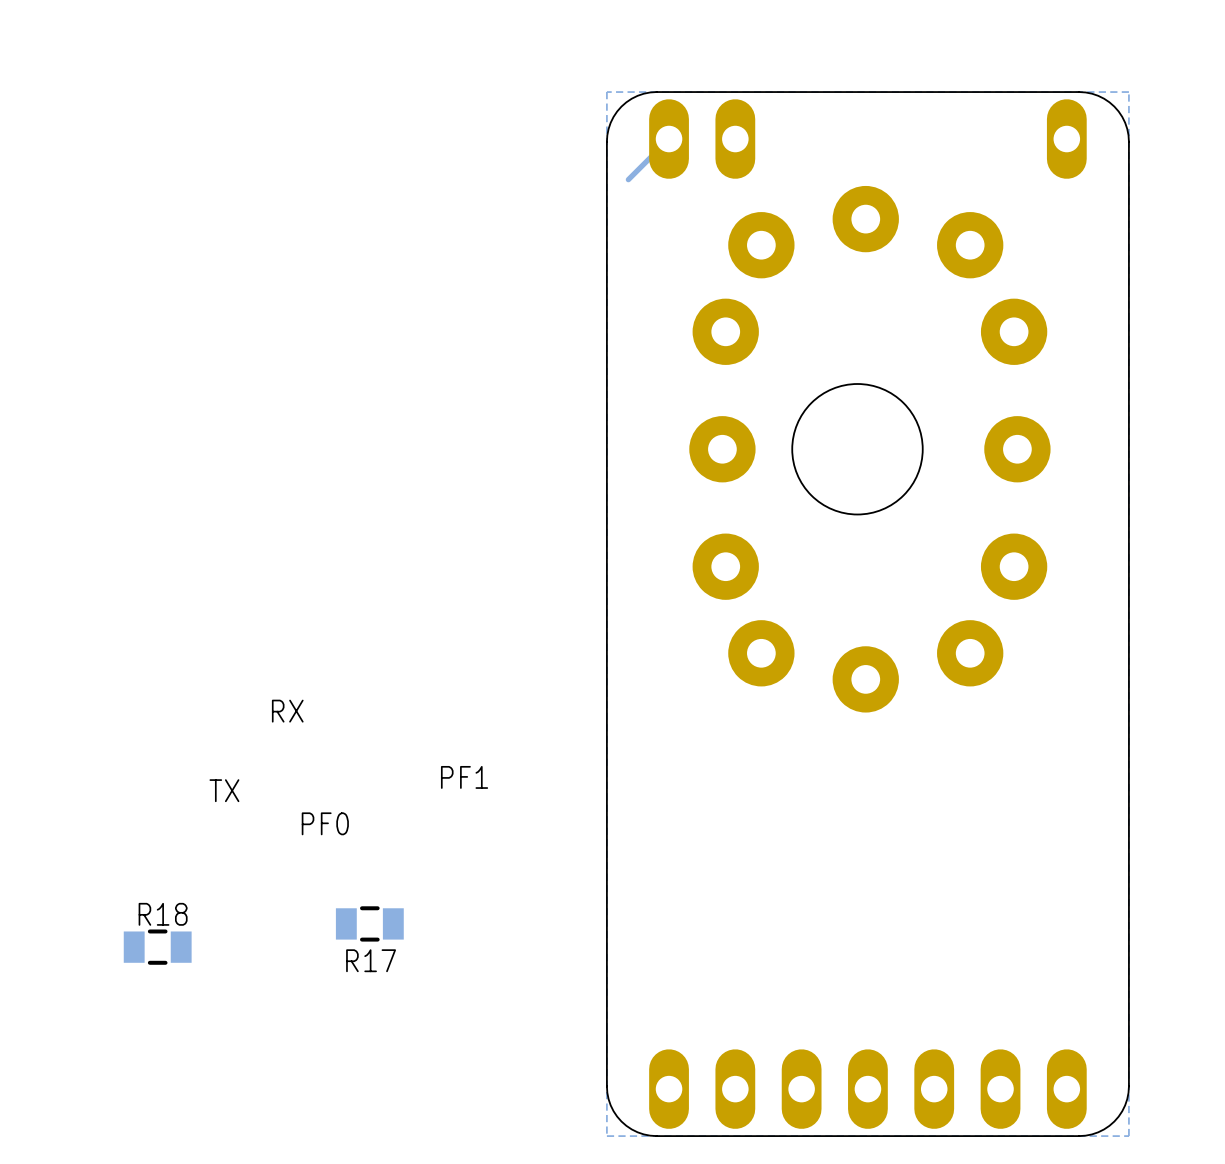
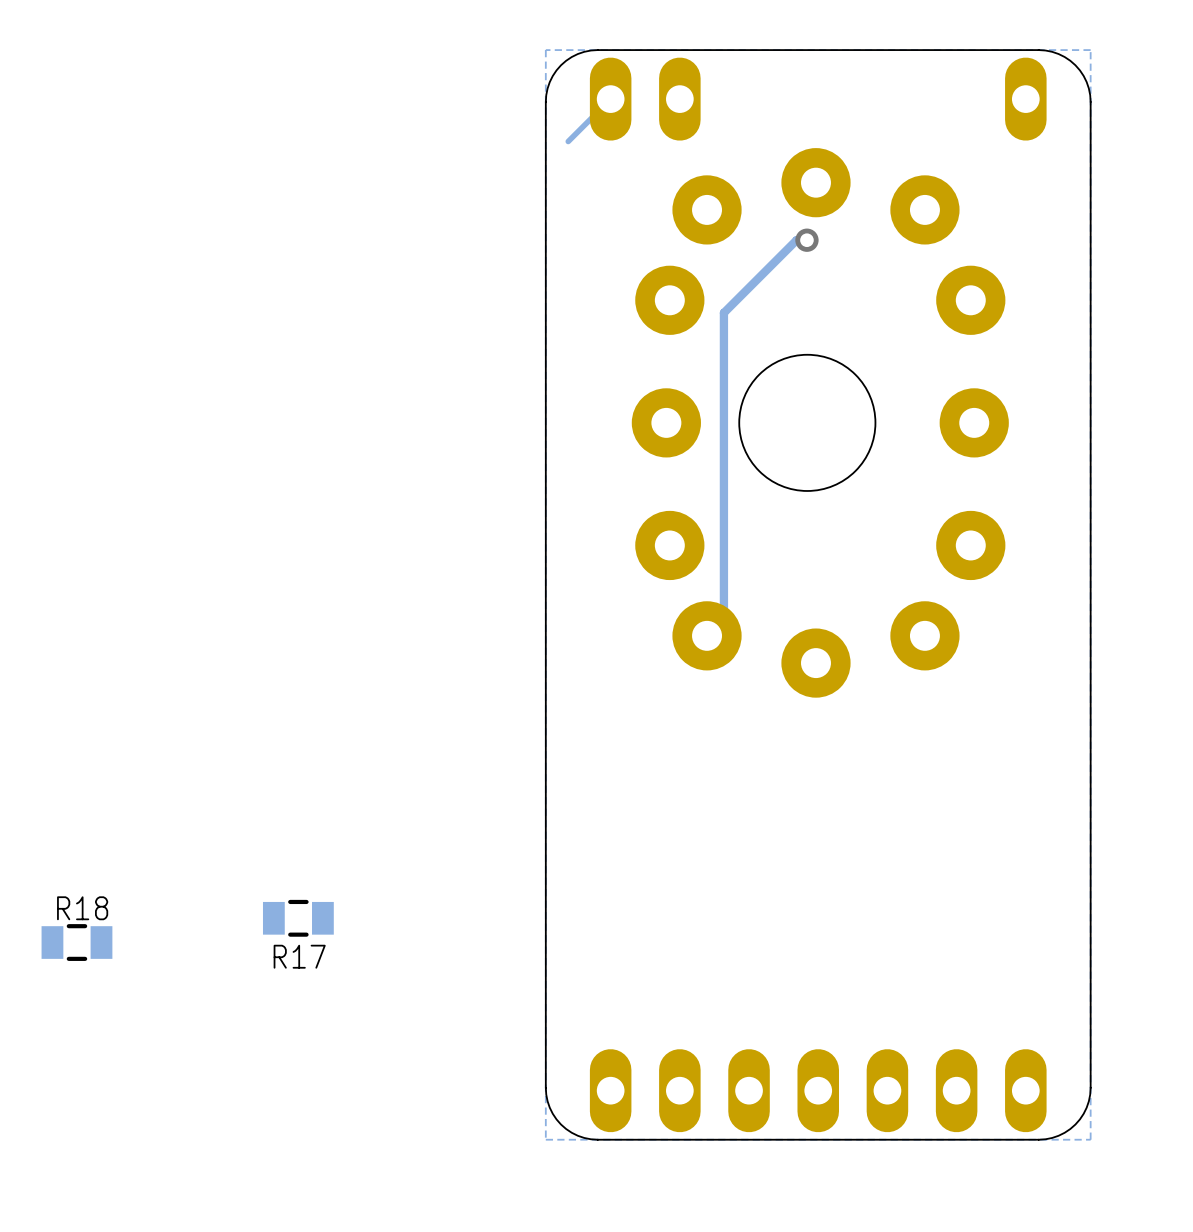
track: none -> (806, 240) (796, 240) (723, 312) (723, 619) (707, 636)
via: none -> (806, 240)
text: RX (287, 711) -> none
text: PF1 (464, 777) -> none
text: TX (224, 790) -> none
text: PF0 (325, 823) -> none

